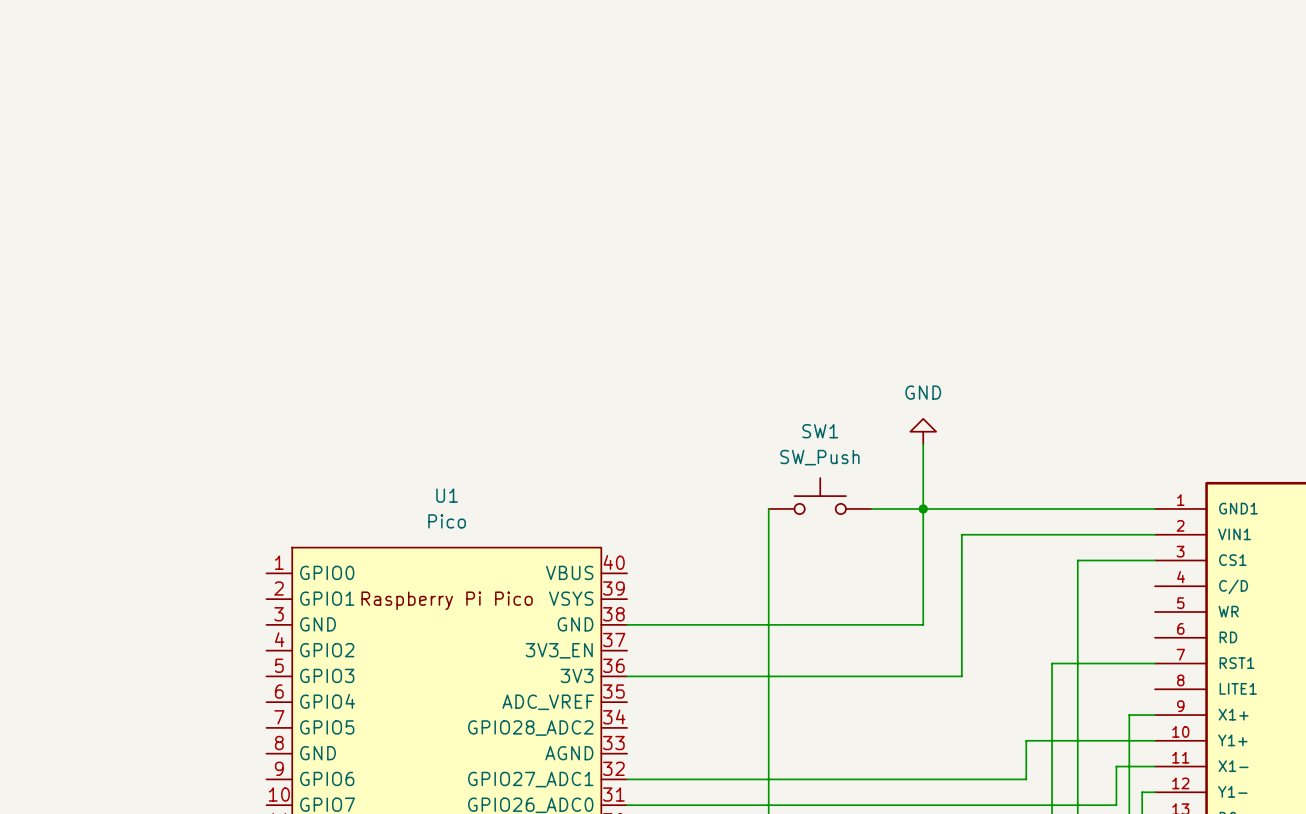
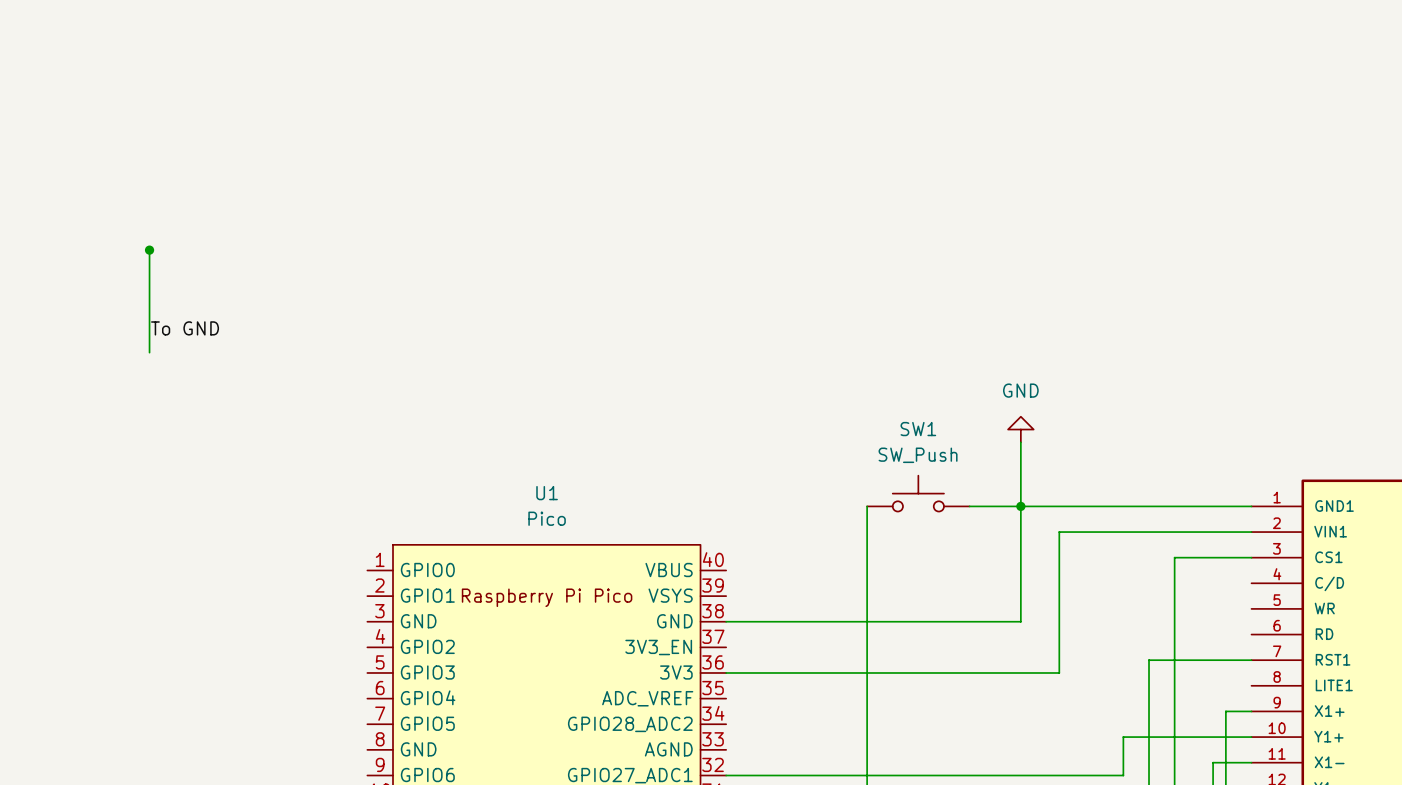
wire: none -> (149, 250) (149, 352)
junction: none -> (149, 250)
label: none -> To GND (185, 328)

